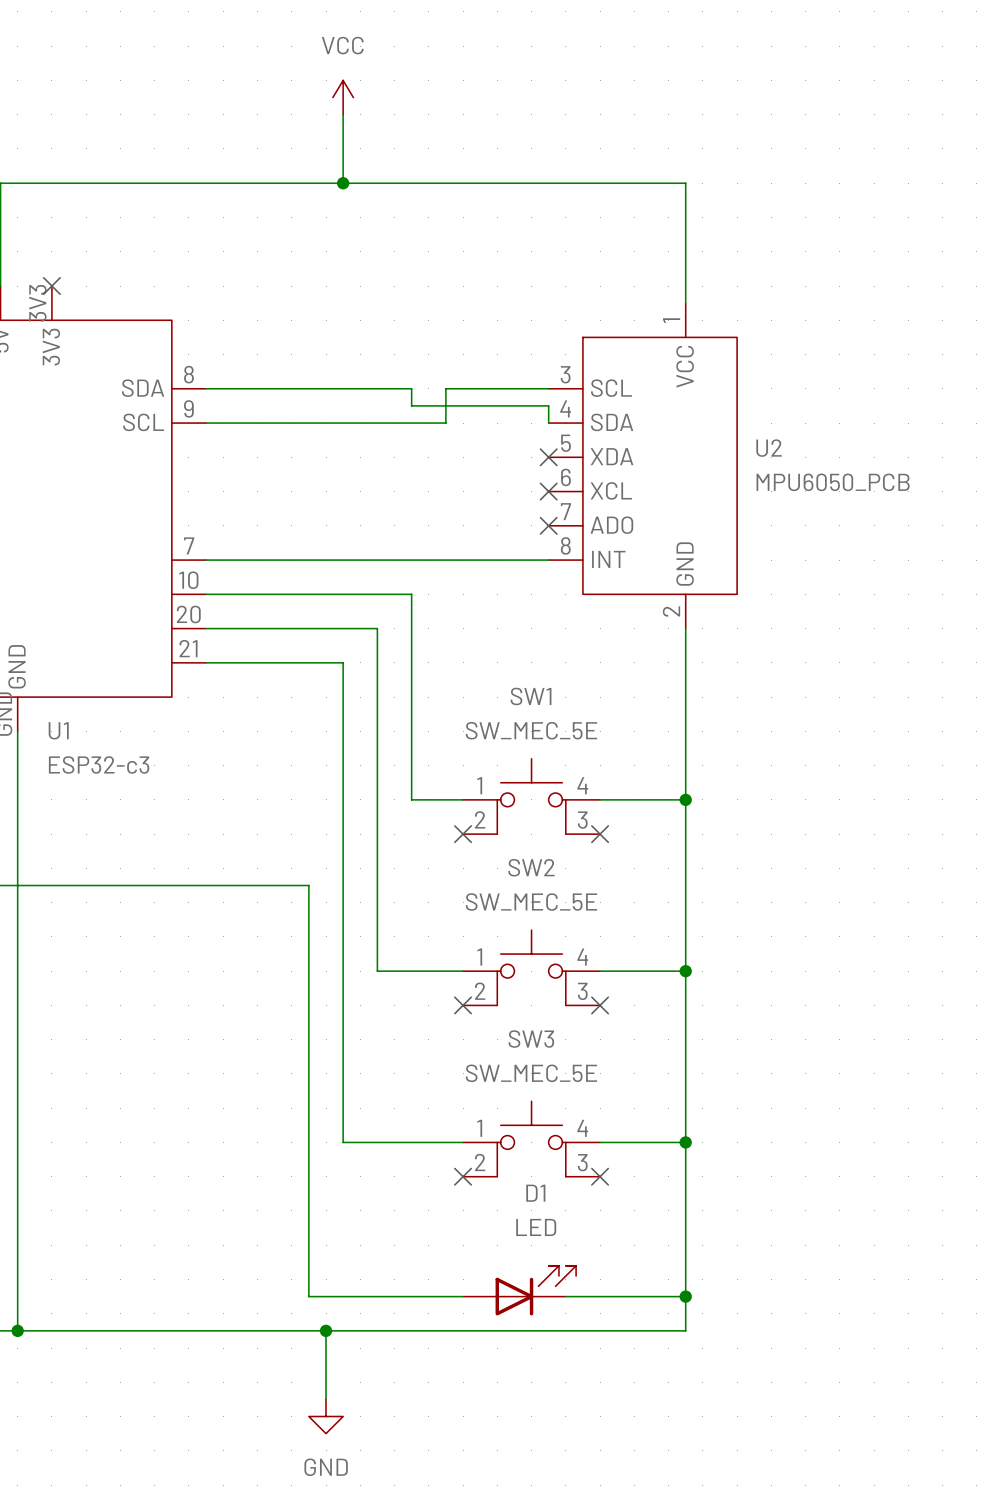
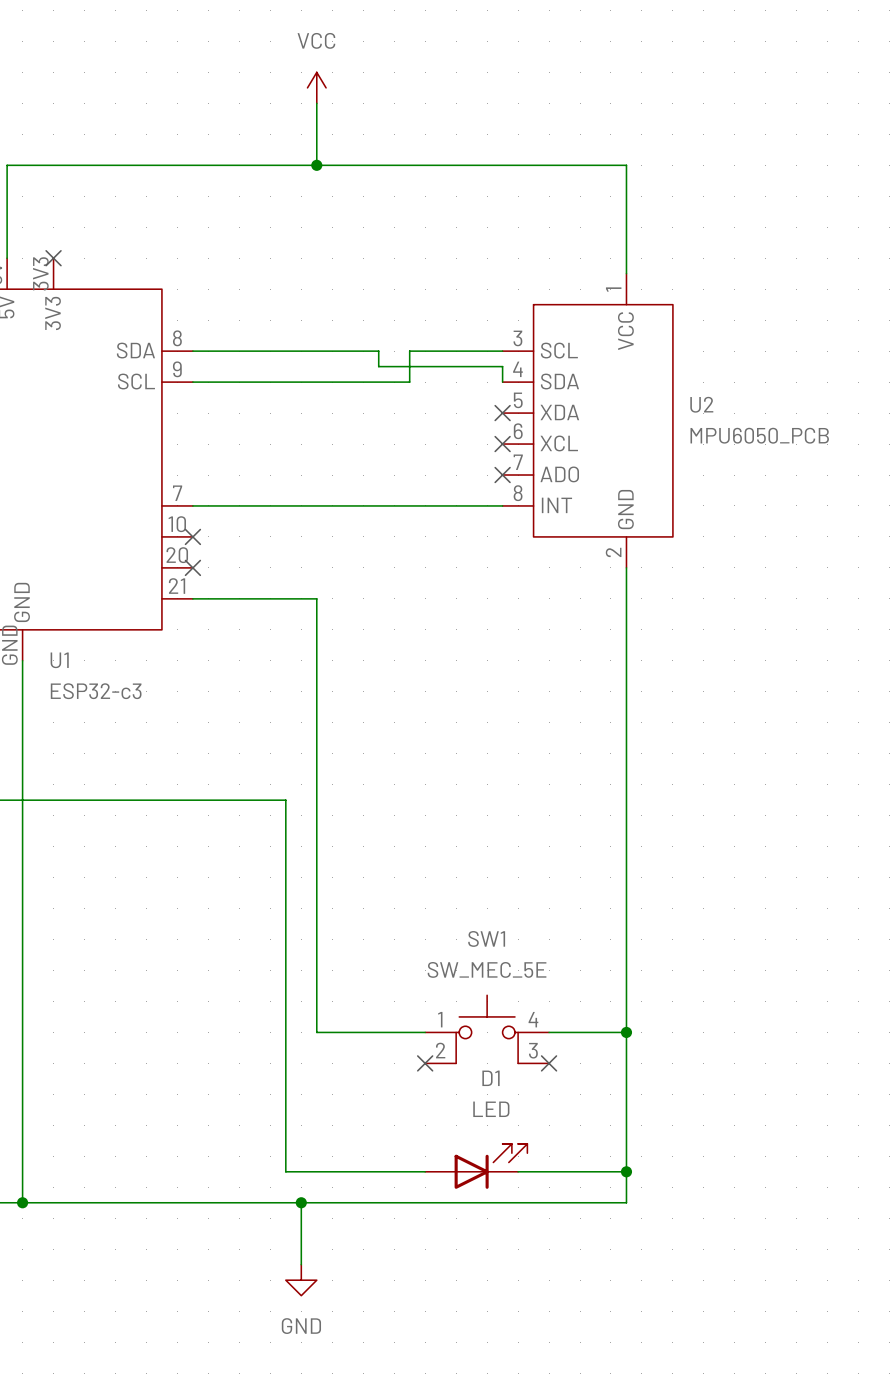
wire: (206, 594) (411, 594) (411, 799) (463, 799) -> none
no-connect mark: none -> (192, 536)
wire: (206, 628) (377, 628) (377, 971) (463, 971) -> none
no-connect mark: none -> (192, 567)
SW1: SW_MEC_5E (531, 796) -> none
wire: (600, 799) (685, 799) -> none
junction: (685, 799) -> none
no-connect mark: (463, 834) -> none
no-connect mark: (600, 834) -> none
SW2: SW_MEC_5E (531, 967) -> none
wire: (600, 971) (685, 971) -> none
junction: (685, 971) -> none
no-connect mark: (463, 1005) -> none
no-connect mark: (600, 1005) -> none
SW3 name: SW3 (531, 1039) -> SW1 (486, 938)

